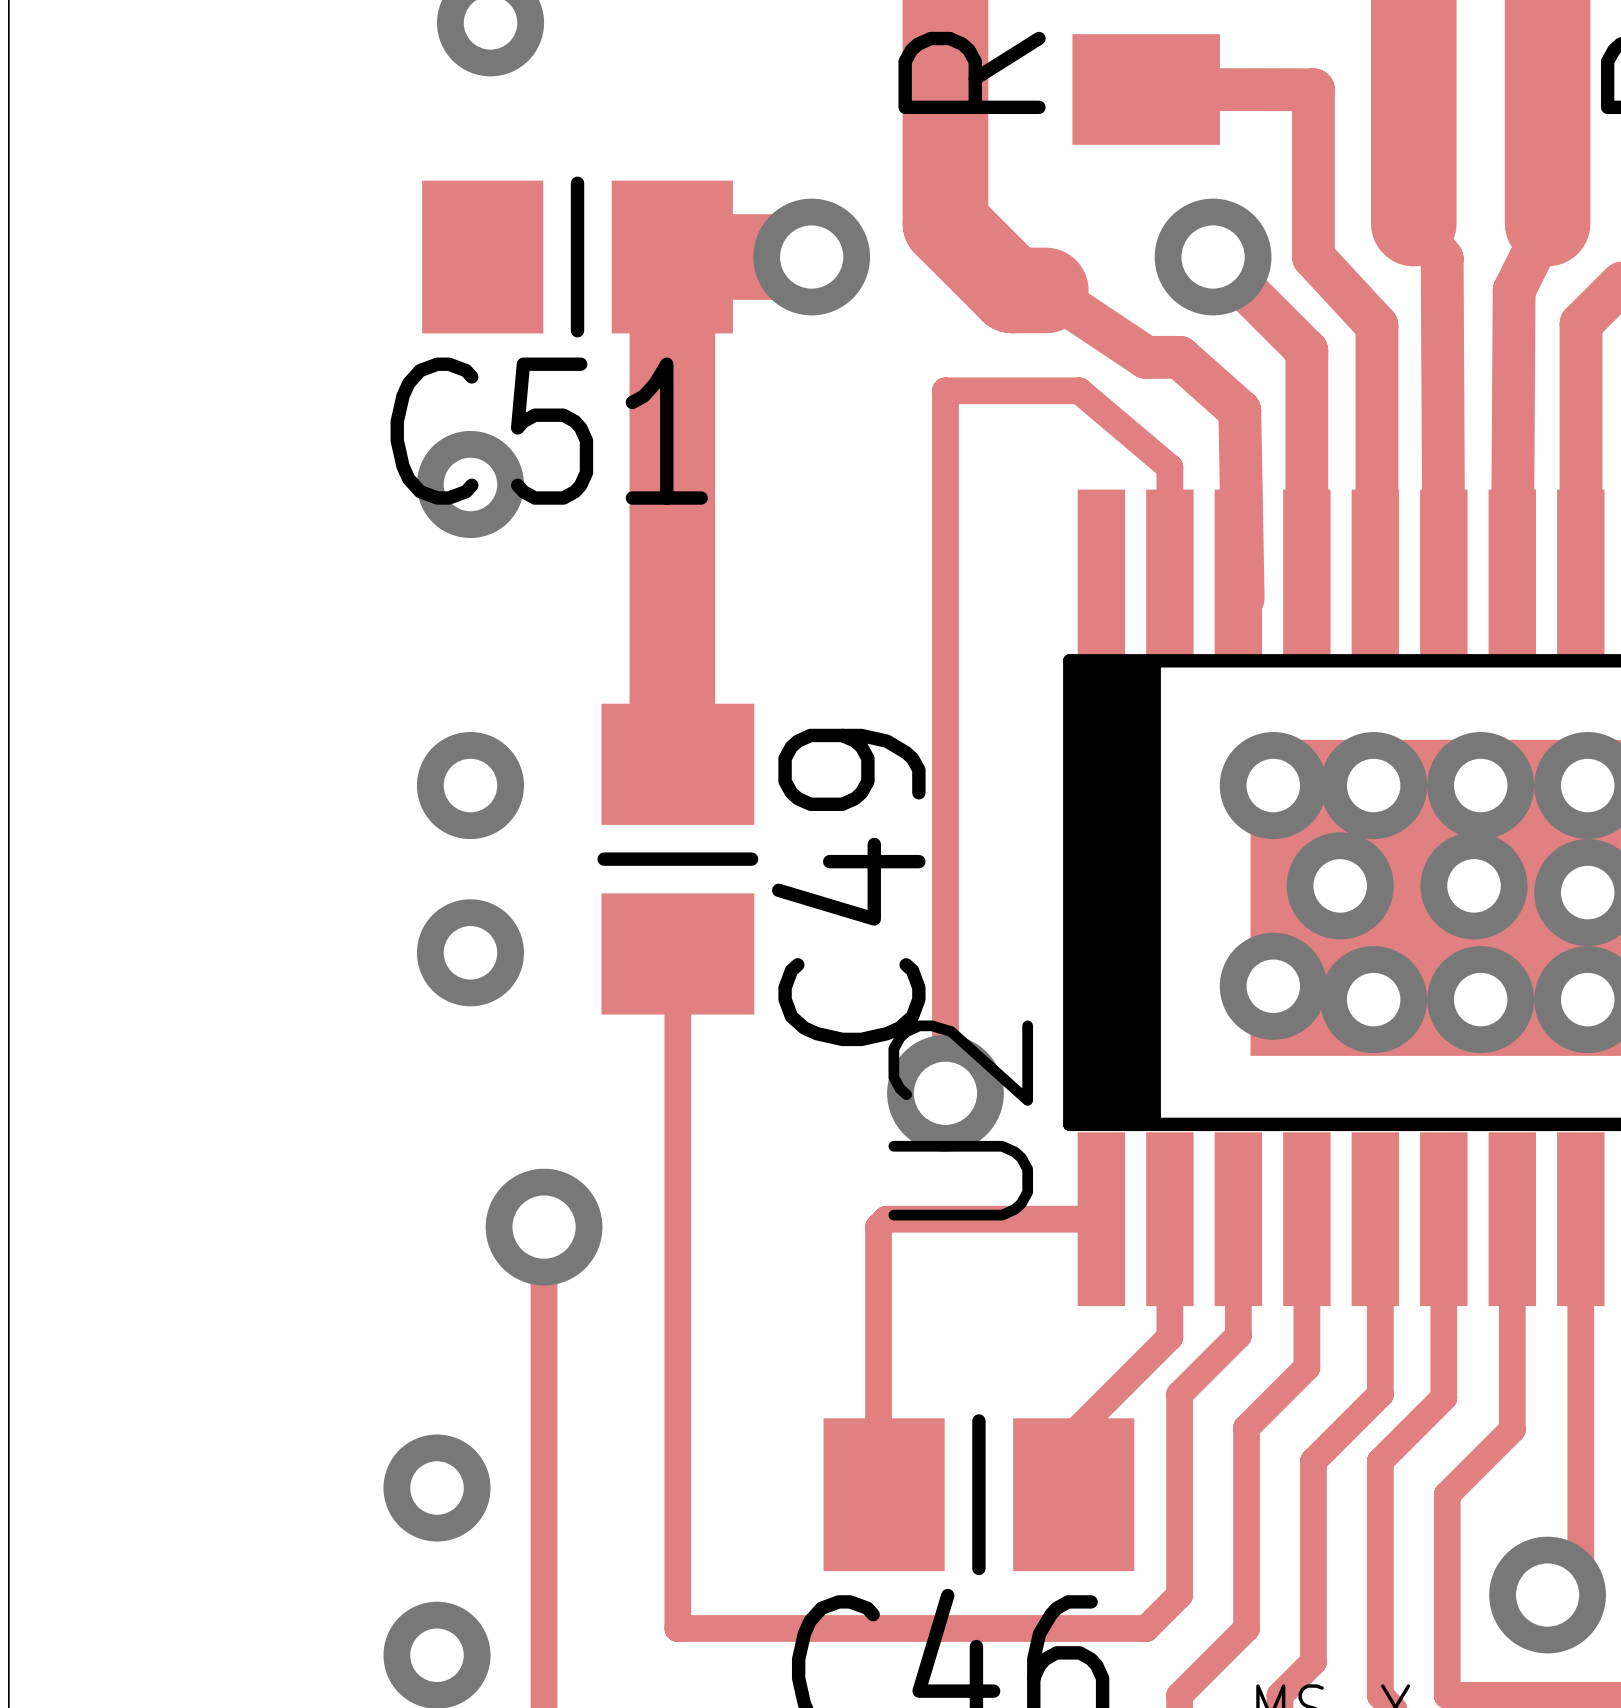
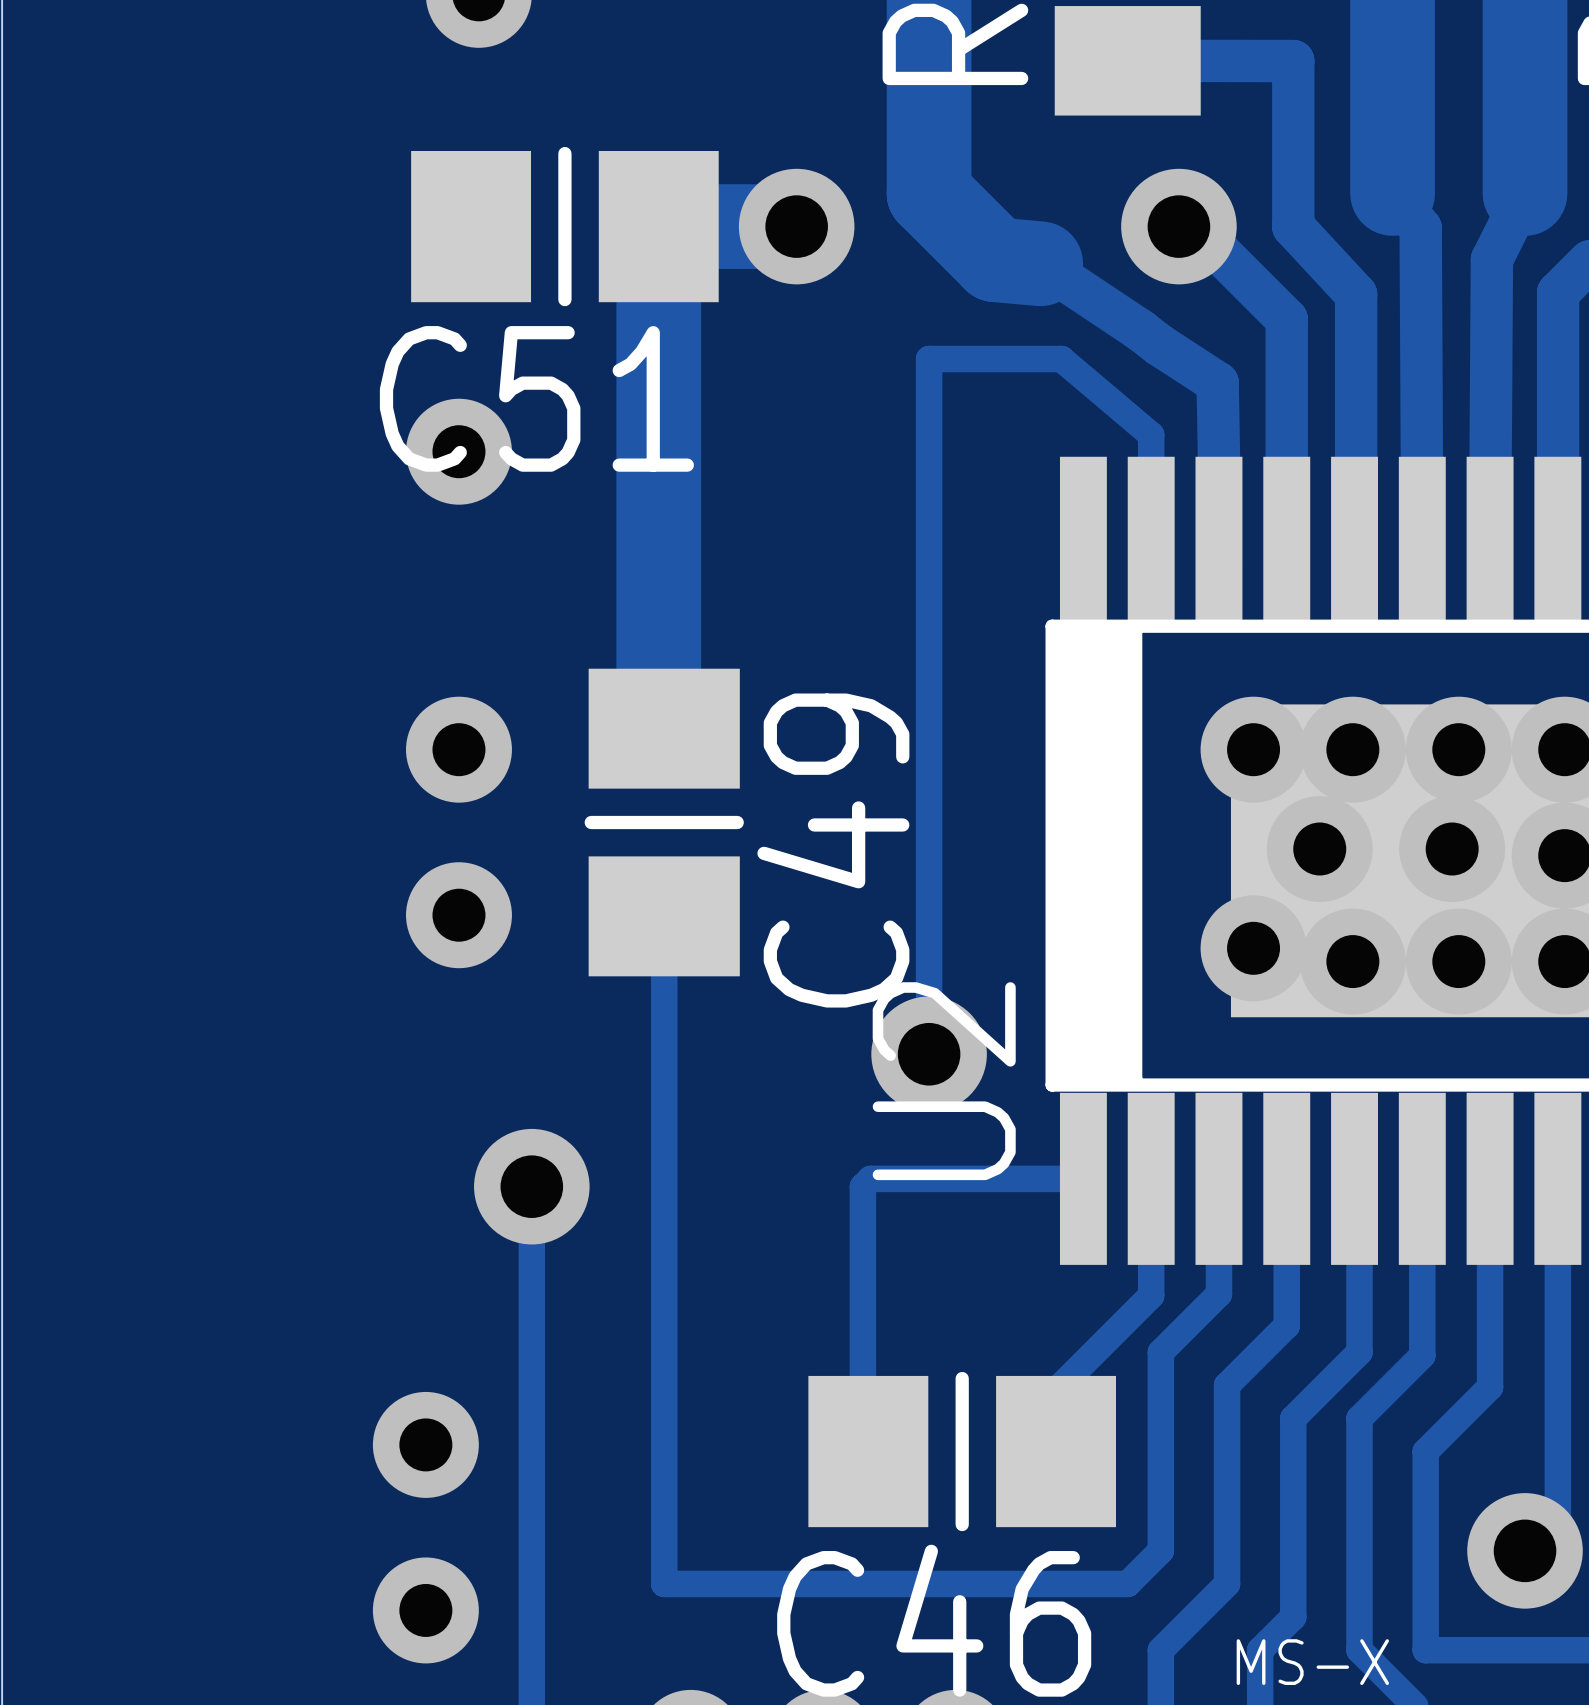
via position: (1213, 257) -> (1178, 226)
track: (1012, 290) (1045, 290) (1146, 357) (1179, 357) (1239, 410) (1243, 598) (1238, 576) -> (995, 259) (1040, 263) (1217, 382) (1220, 568) (1218, 542)

